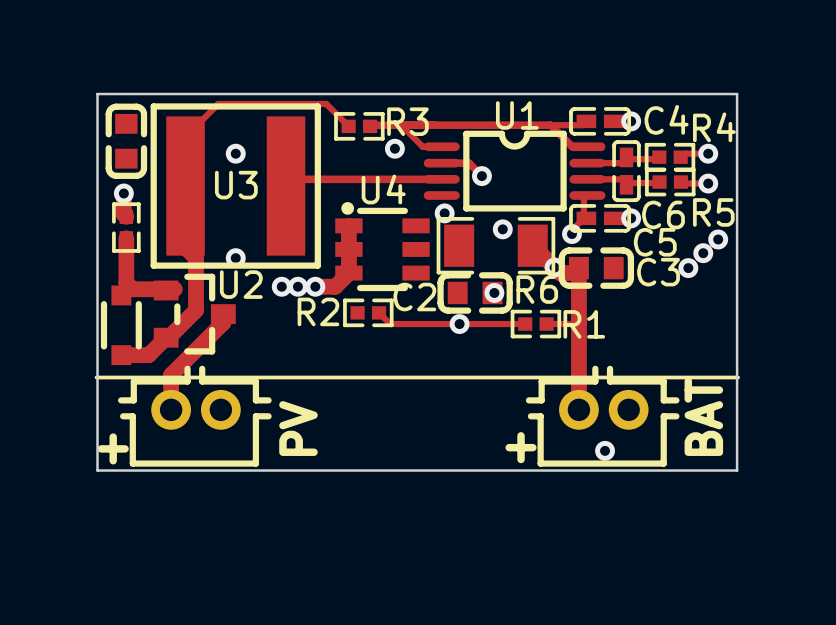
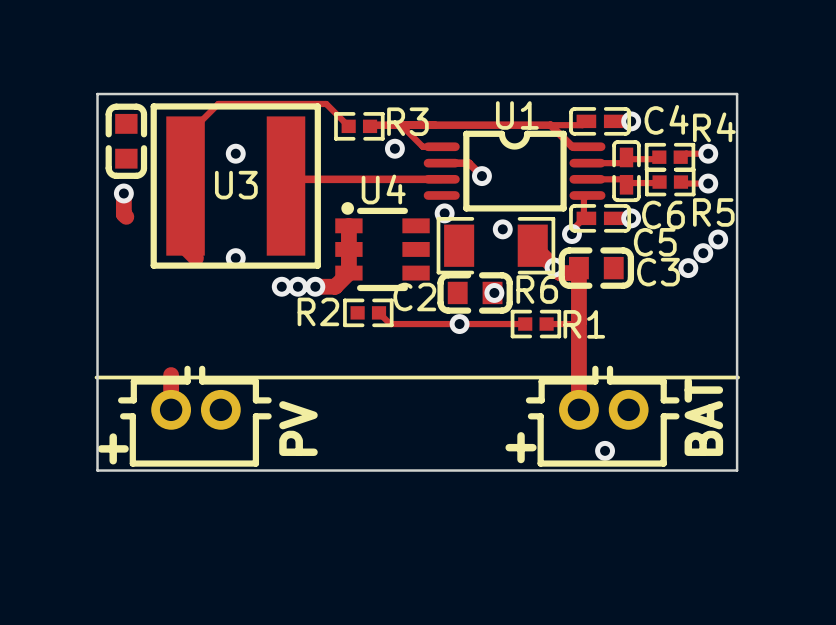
part: (126, 227) -> none
track: (126, 238) (126, 283) (132, 289) (174, 289) -> none
track: (195, 258) (195, 310) (148, 355) (121, 355) -> none
U2: (194, 314) -> none
track: (223, 314) (223, 322) (171, 375) -> none
part: (121, 325) -> none

